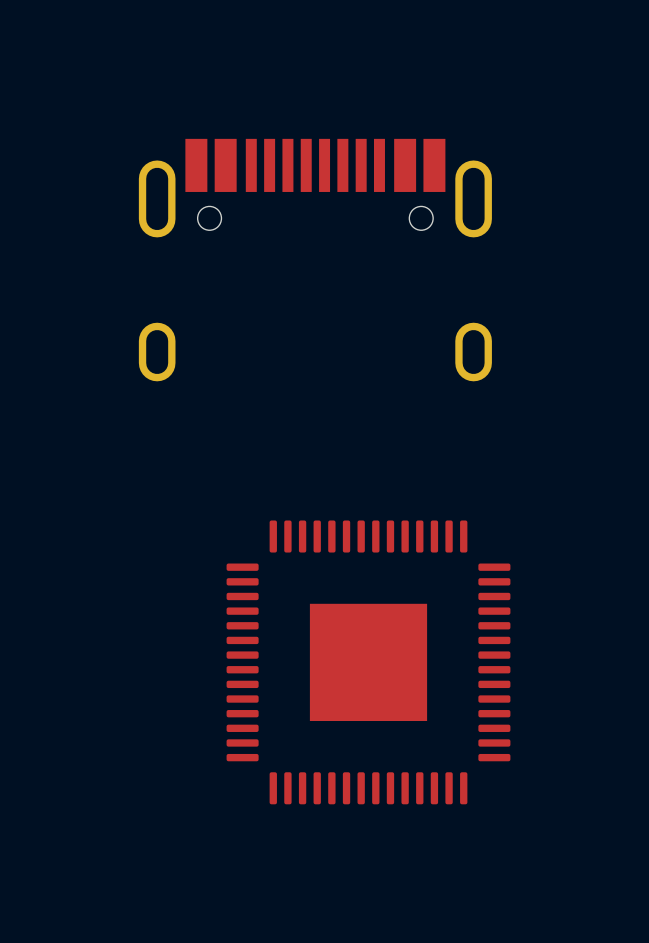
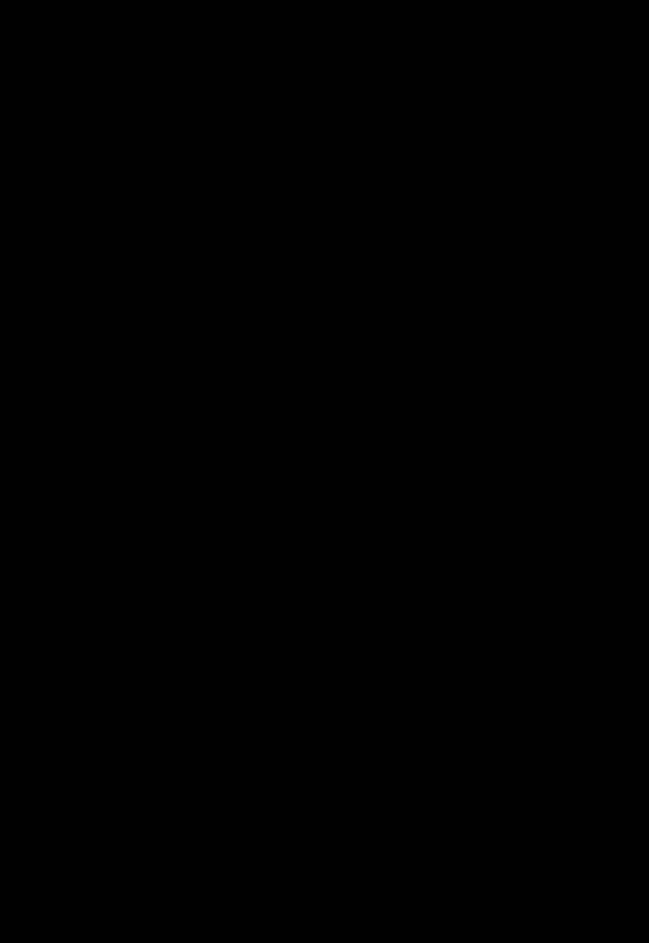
part: (315, 260) -> none
part: (368, 662) -> none

